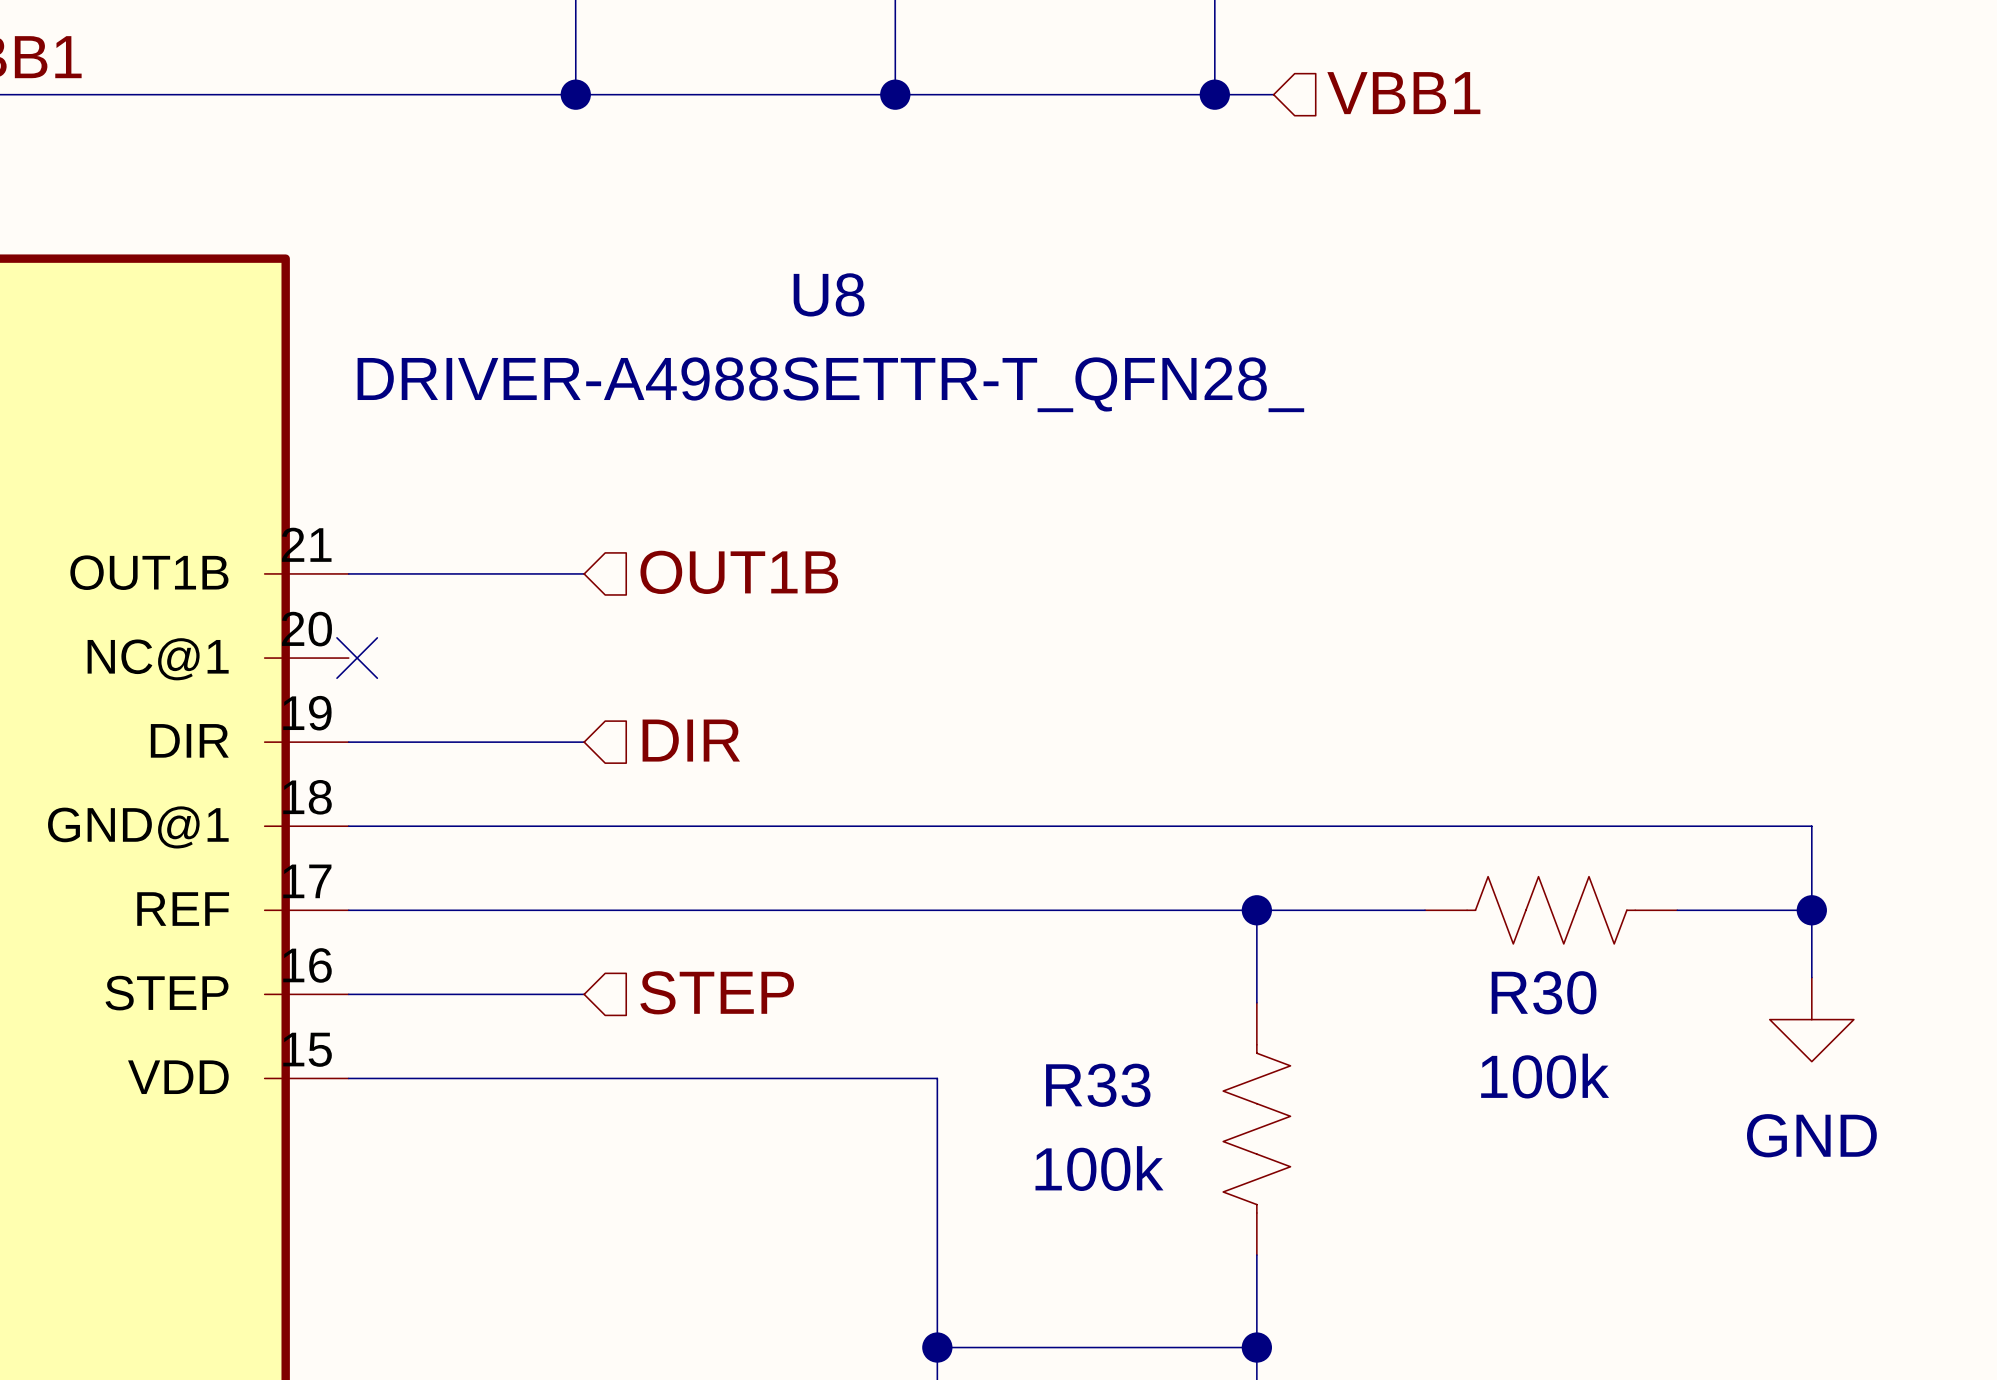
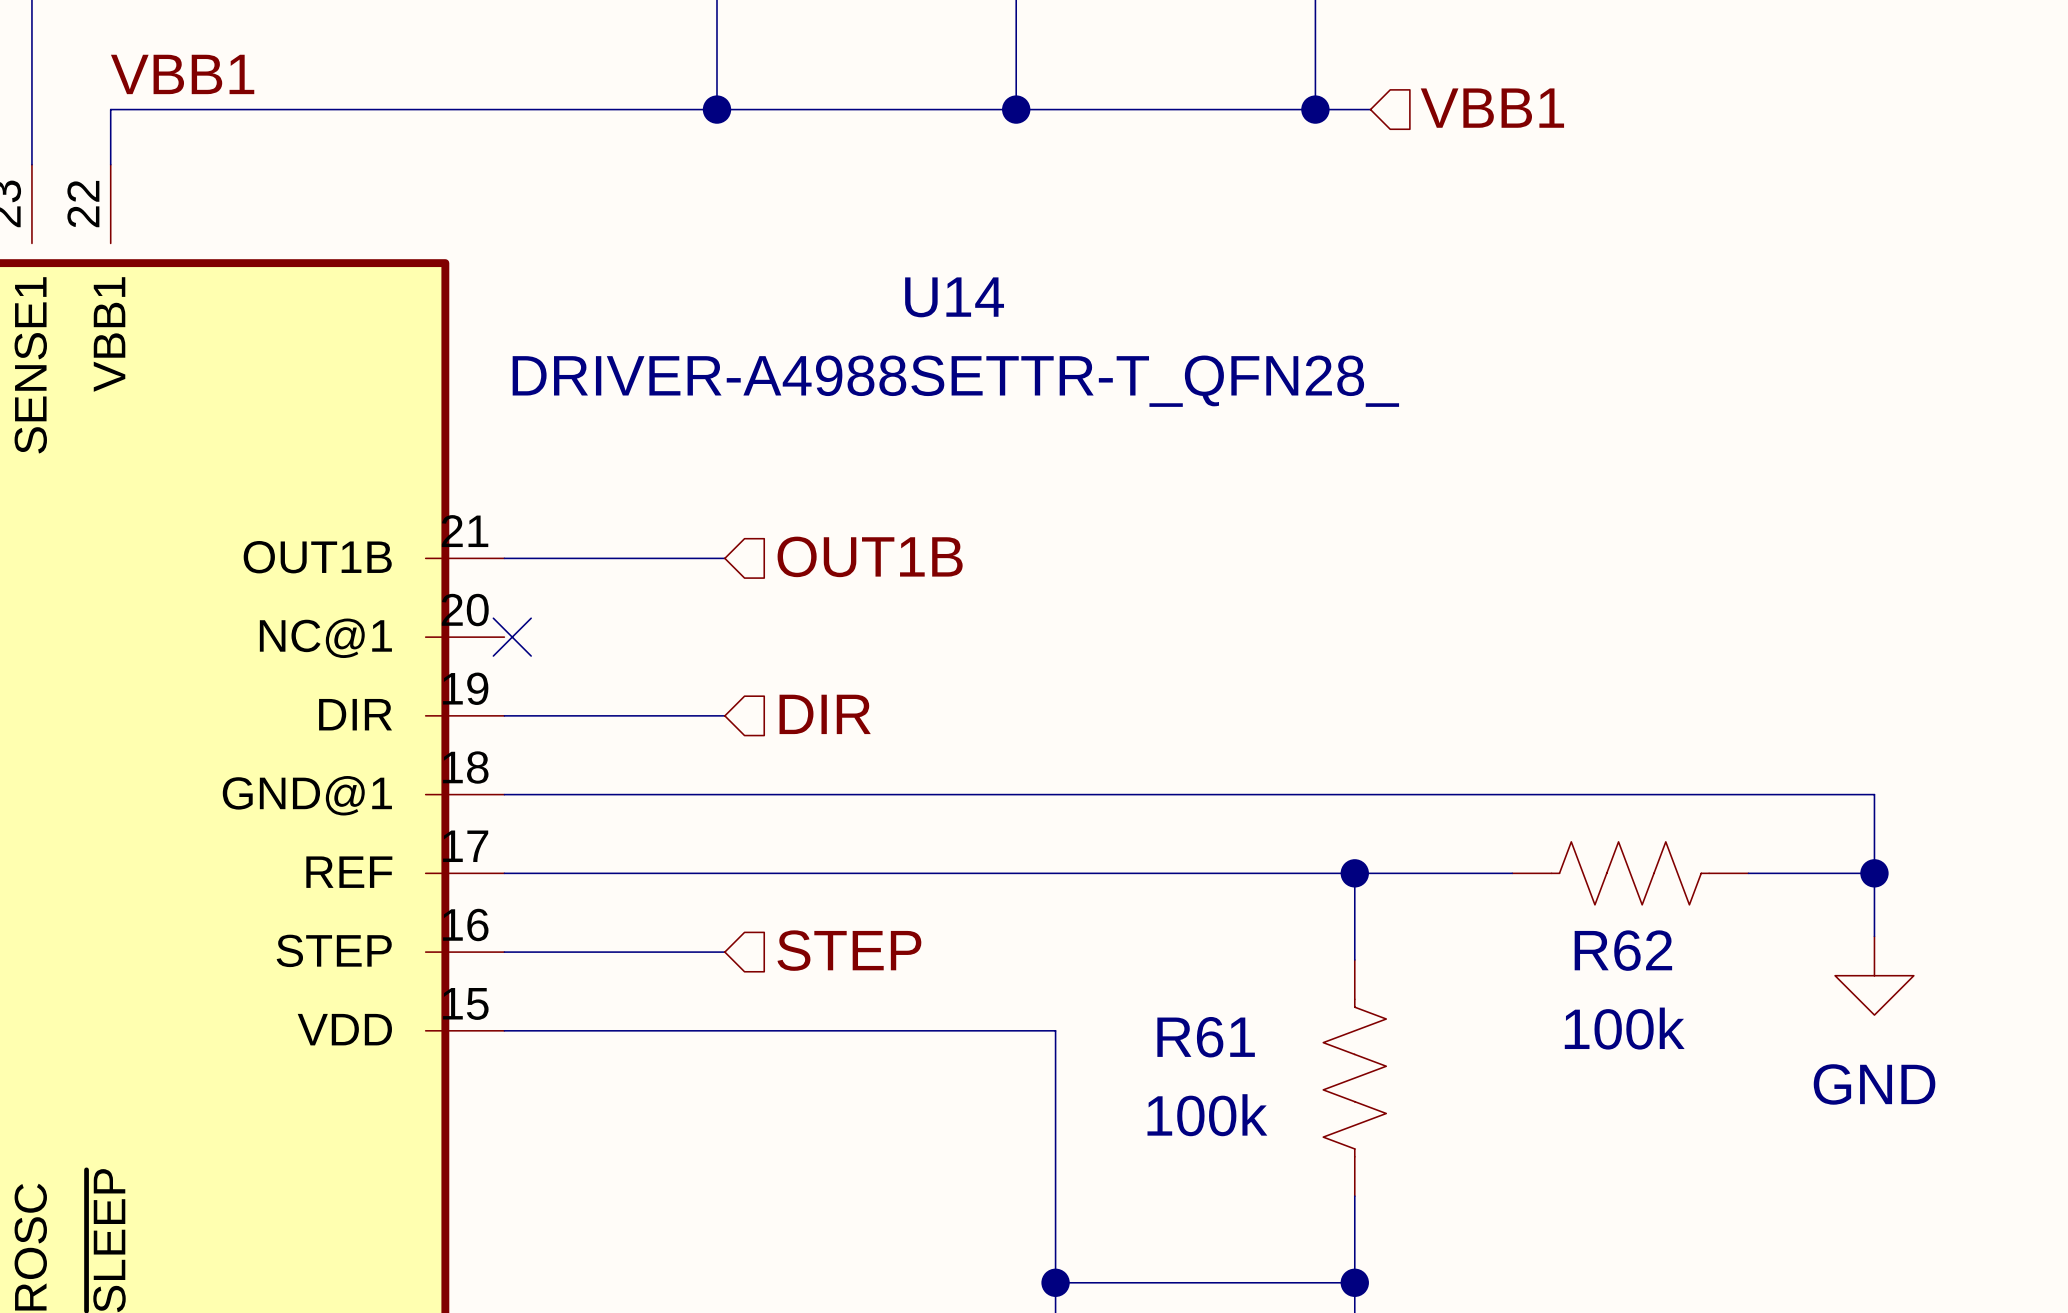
U8 name: U8 (829, 294) -> U14 (954, 297)
R30 name: R30 (1544, 992) -> R62 (1623, 950)
R33 name: R33 (1098, 1085) -> R61 (1206, 1037)

